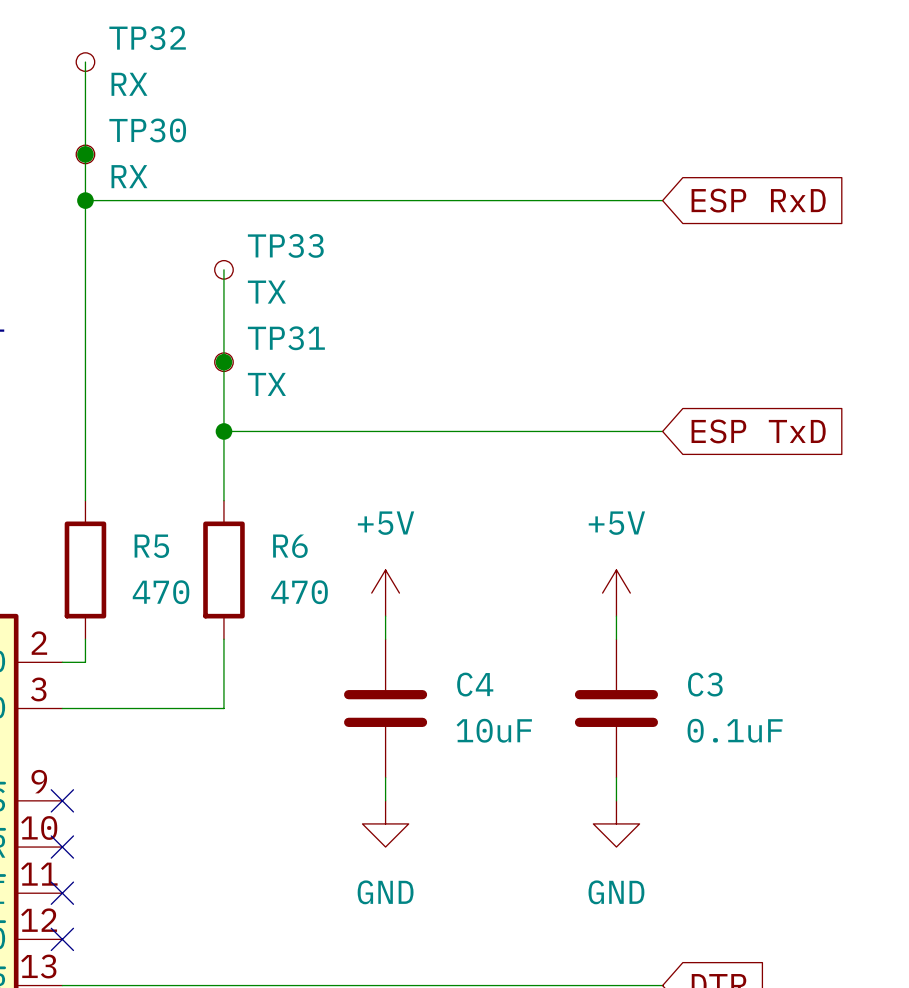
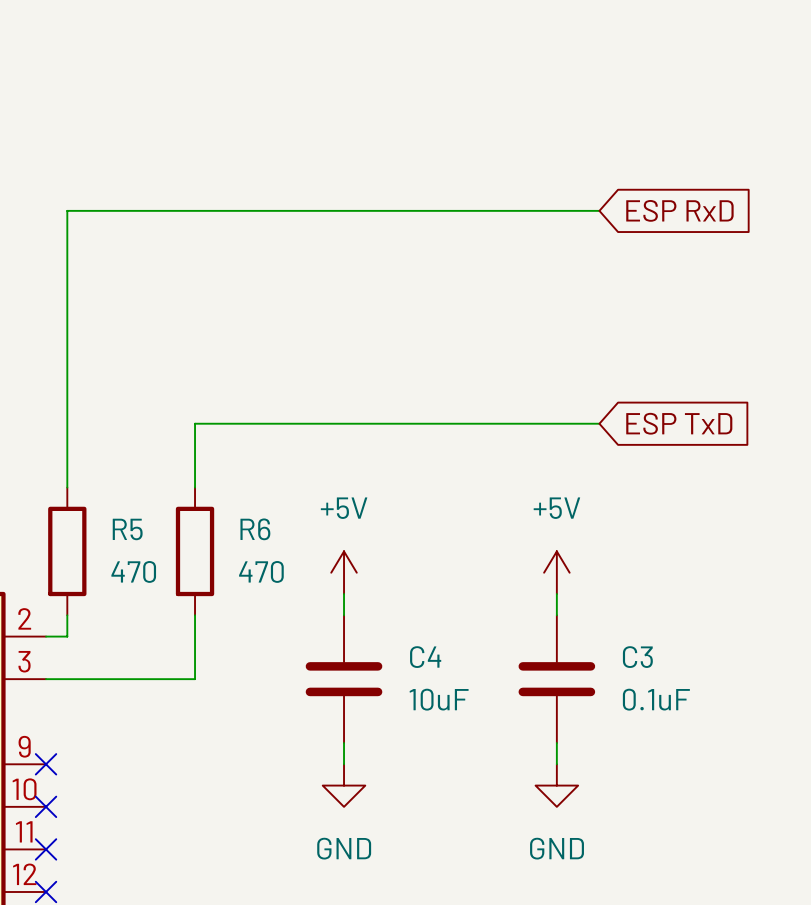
wire: (85, 62) (85, 200) -> none
TP32: RX (85, 62) -> none
junction: (85, 154) -> none
TP30: RX (85, 154) -> none
junction: (85, 200) -> none
wire: (223, 269) (223, 431) -> none
TP33: TX (223, 269) -> none
junction: (223, 362) -> none
TP31: TX (223, 362) -> none
junction: (223, 431) -> none

